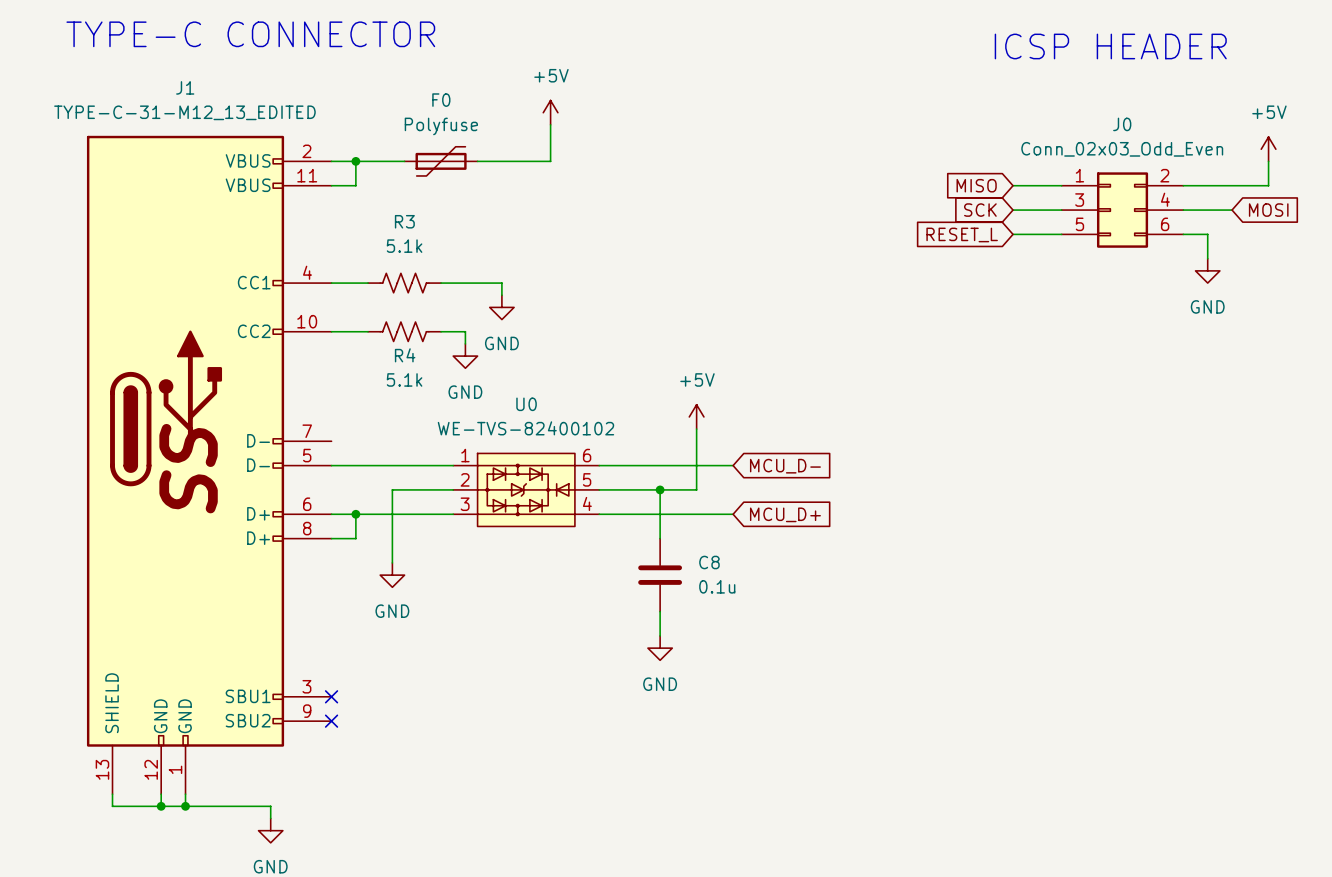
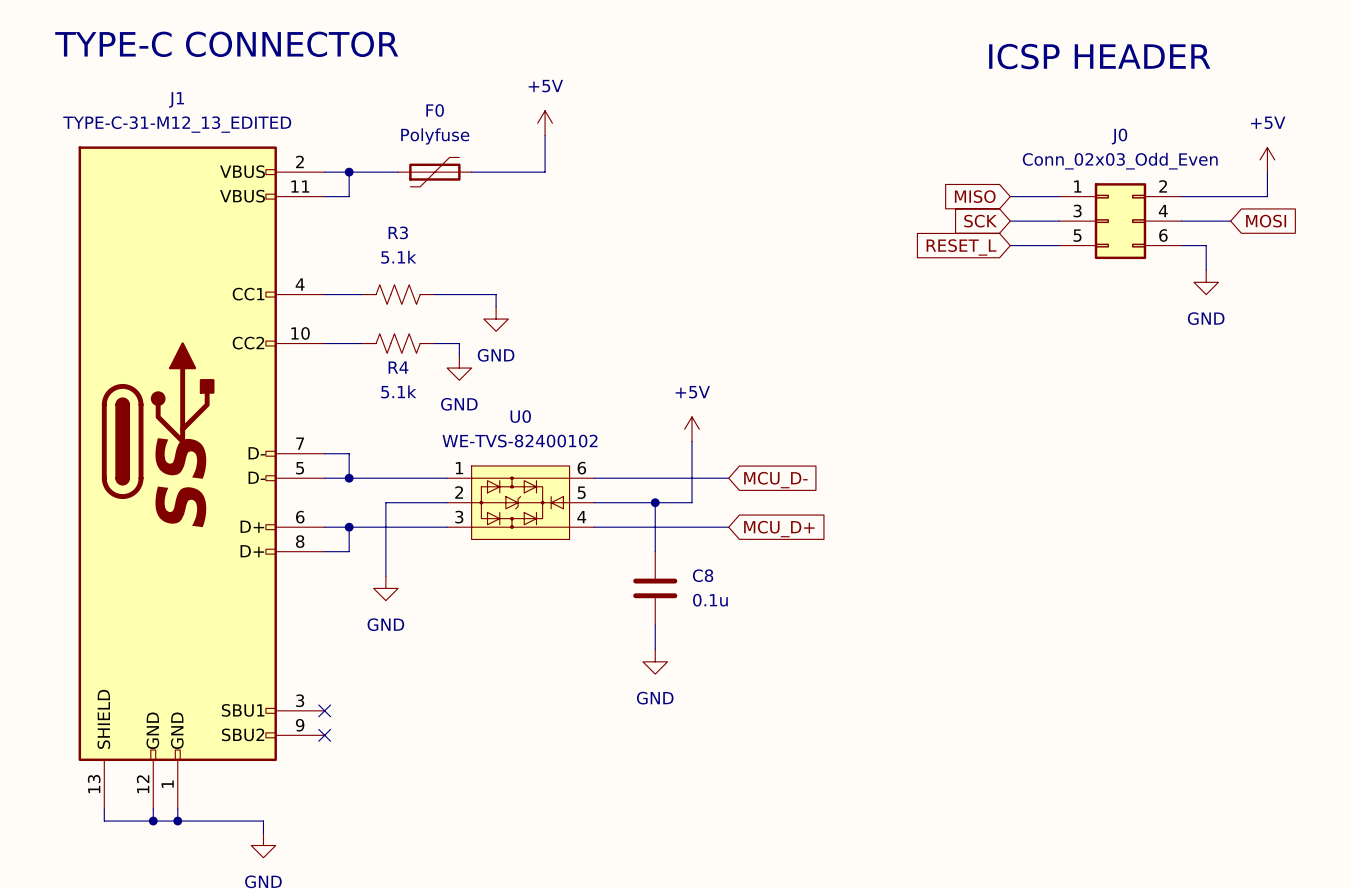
wire: none -> (324, 453) (349, 453) (349, 478)
junction: none -> (349, 478)

